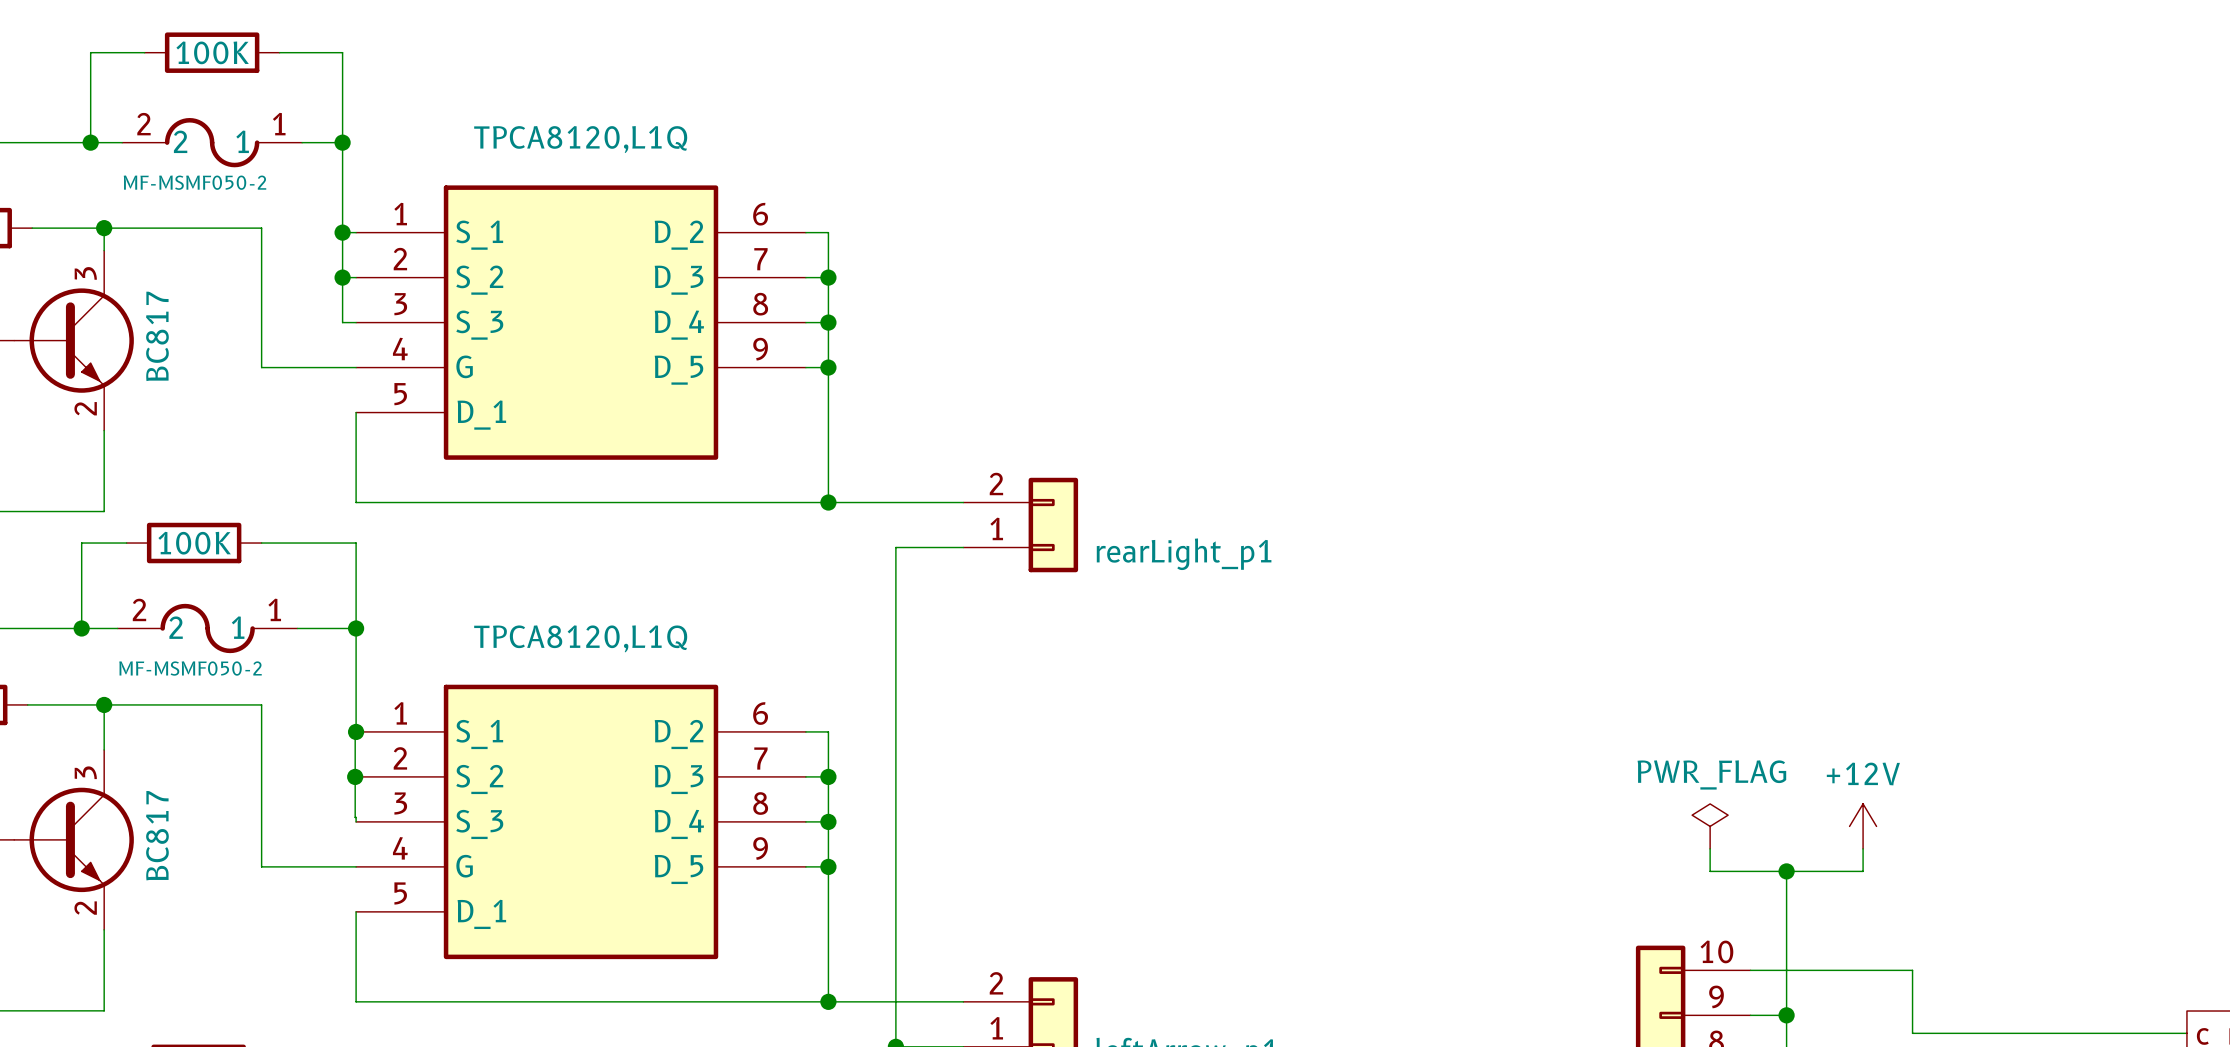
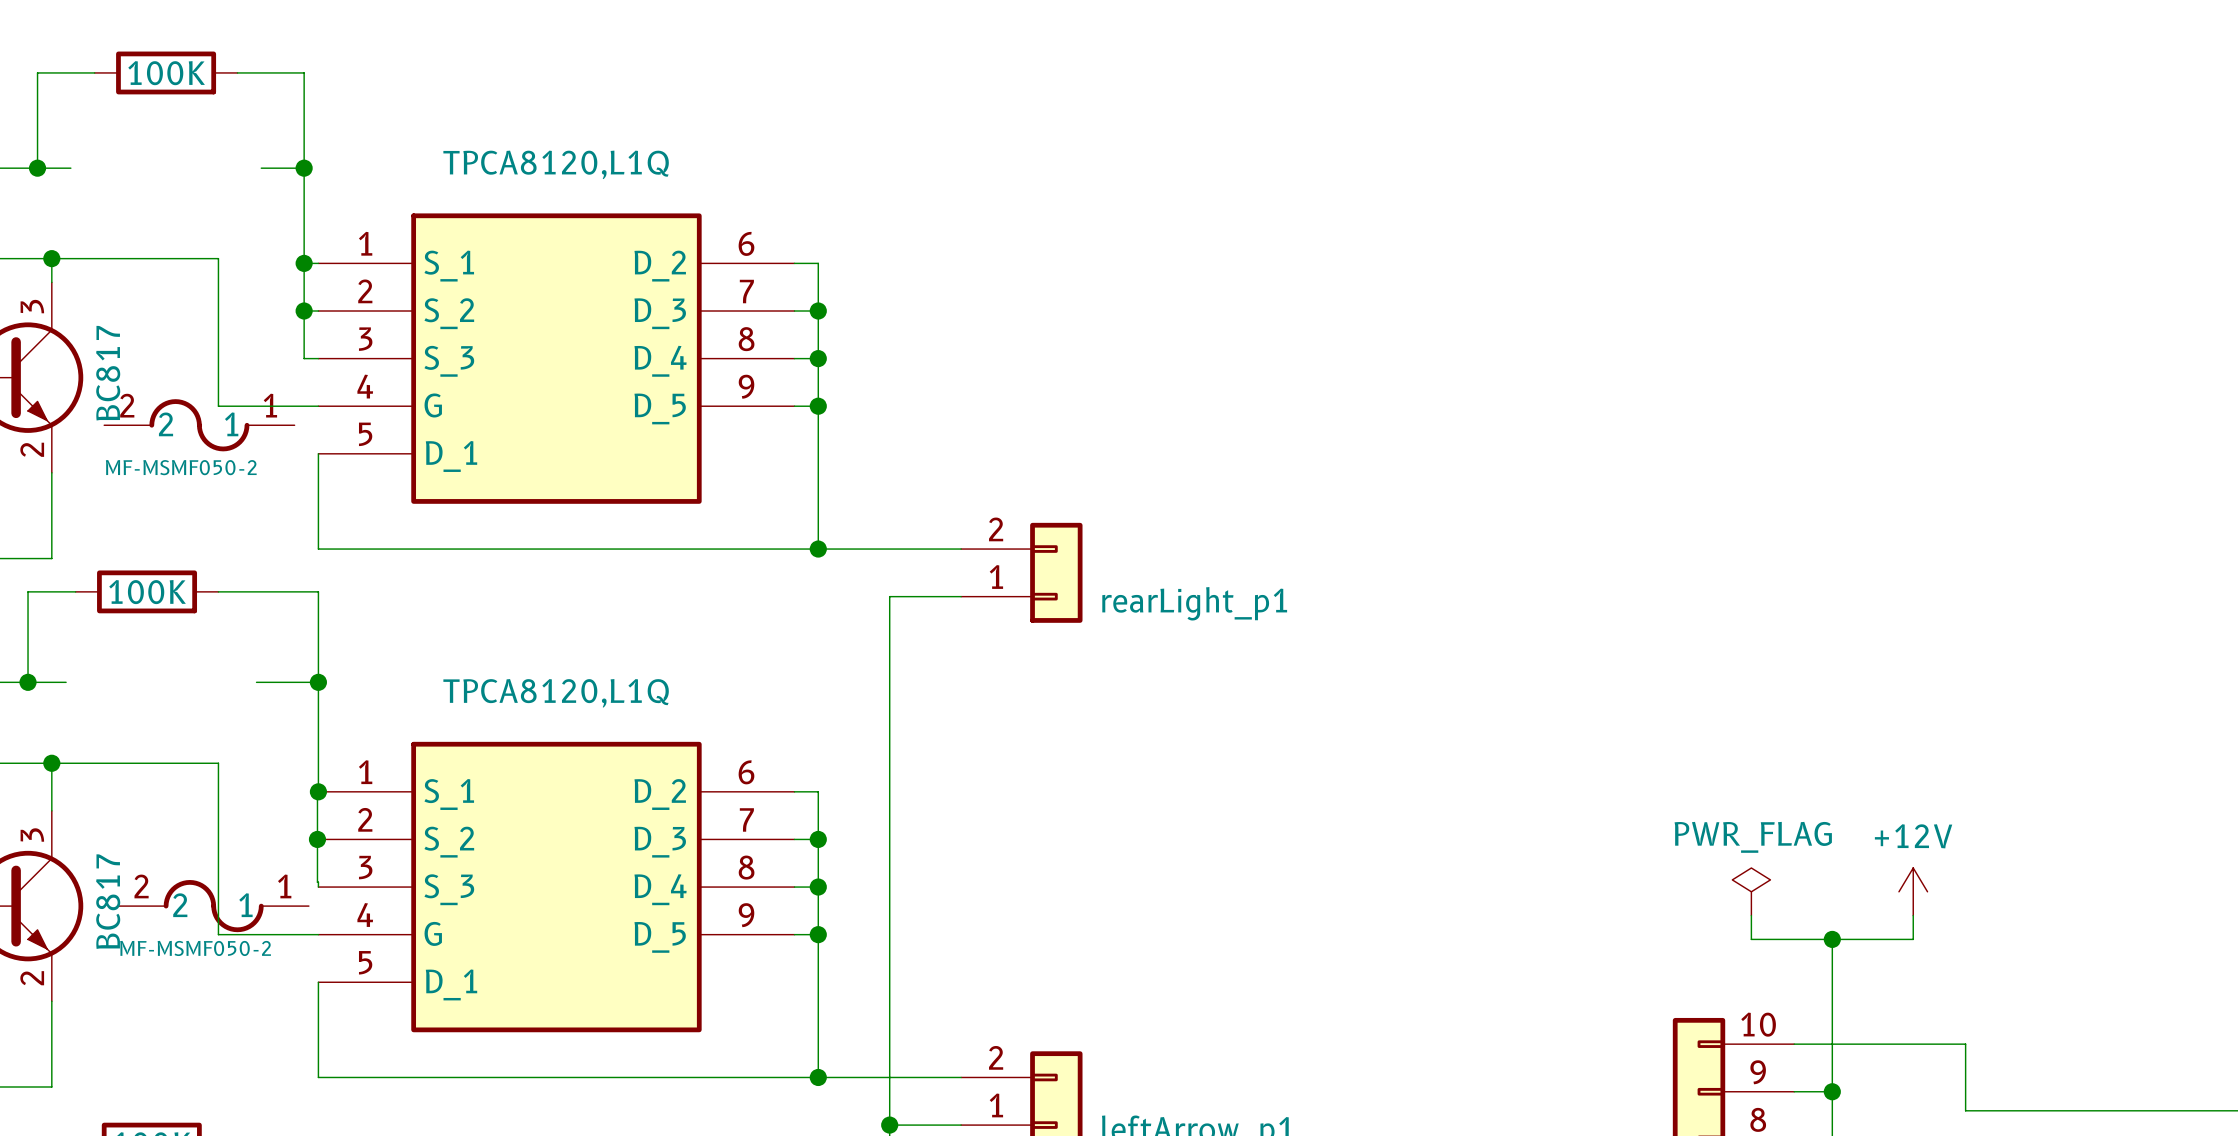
part: MF-MSMF050-2 (212, 142) -> none
part: none -> MF-MSMF050-2 (199, 425)
part: MF-MSMF050-2 (207, 628) -> none
part: none -> MF-MSMF050-2 (213, 906)

